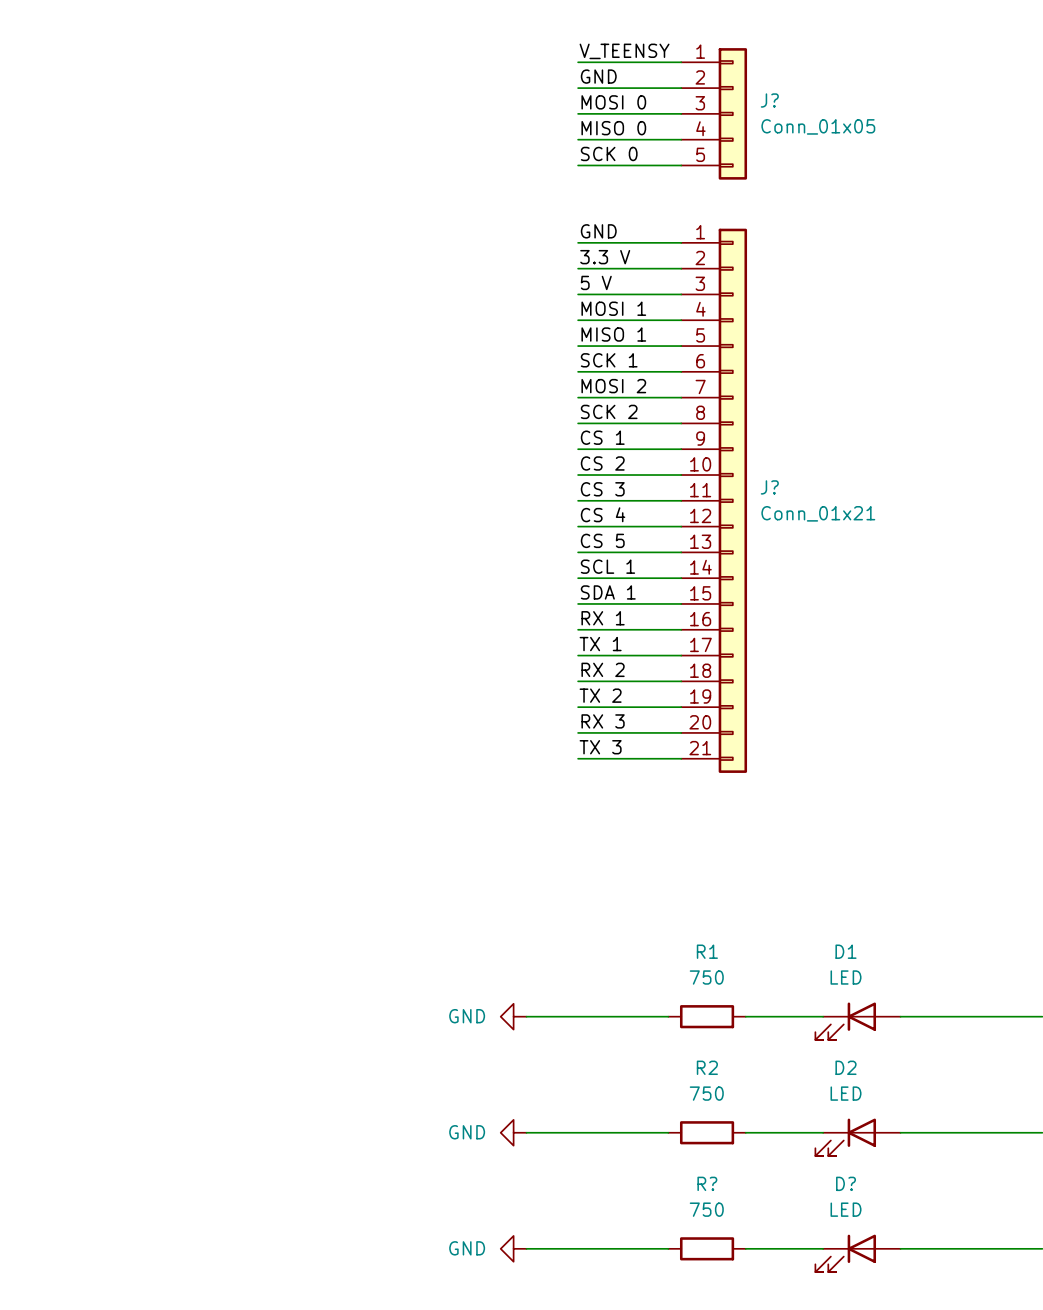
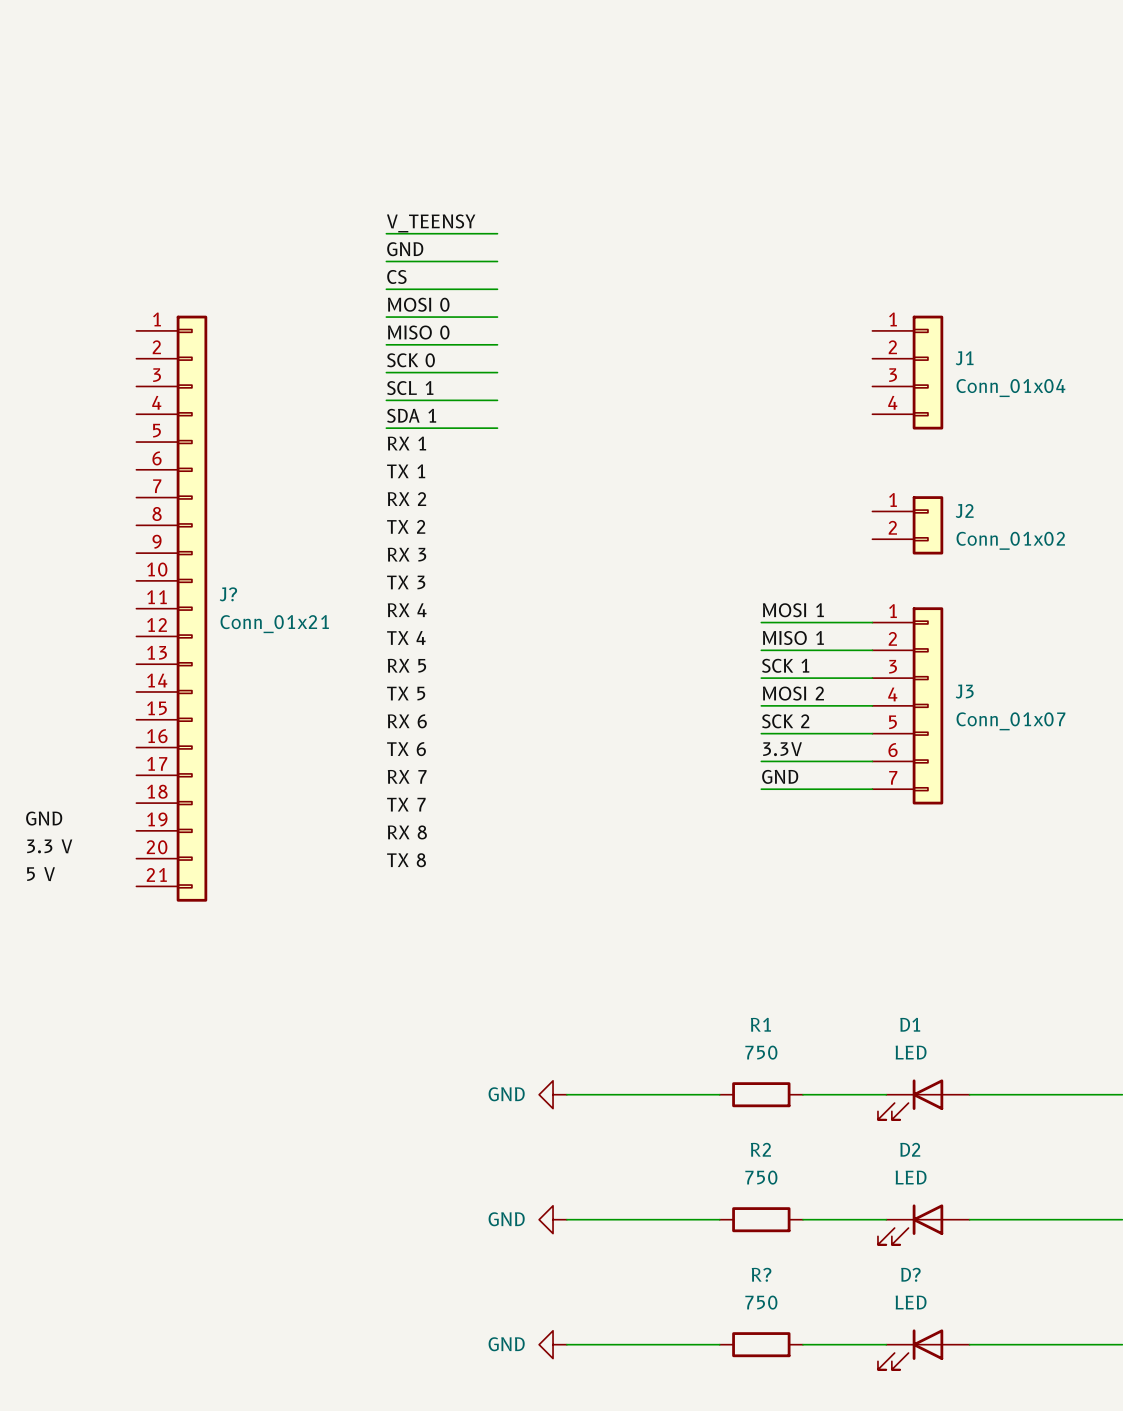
label: V_TEENSY (624, 51) -> none
wire: (578, 62) (681, 62) -> none
label: GND (598, 76) -> none
wire: (578, 88) (681, 88) -> none
label: MOSI 0 (613, 102) -> none
wire: (578, 113) (681, 113) -> none
J?: Conn_01x05 (714, 113) -> none
label: MISO 0 (613, 128) -> none
wire: (578, 139) (681, 139) -> none
label: SCK 0 (609, 153) -> none
wire: (578, 165) (681, 165) -> none
label: none -> V_TEENSY (431, 223)
label: none -> GND (405, 249)
label: GND (598, 231) -> none
wire: (578, 242) (681, 242) -> (386, 233) (497, 233)
label: none -> CS (396, 276)
label: 3.3 V (605, 257) -> none
wire: (578, 268) (681, 268) -> (386, 261) (497, 261)
label: none -> MOSI 0 (418, 304)
label: 5 V (596, 282) -> none
wire: (578, 294) (681, 294) -> (386, 289) (497, 289)
label: none -> MISO 0 (418, 332)
label: MOSI 1 (613, 308) -> none
wire: (578, 320) (681, 320) -> (386, 317) (497, 317)
label: none -> SCK 0 (411, 360)
label: MISO 1 (613, 334) -> none
wire: (578, 346) (681, 346) -> (386, 344) (497, 344)
J1: none -> Conn_01x04 (907, 372)
label: none -> SCL 1 (410, 388)
label: SCK 1 (609, 360) -> none
wire: (578, 371) (681, 371) -> (386, 372) (497, 372)
label: none -> SDA 1 (411, 415)
label: MOSI 2 (613, 386) -> none
wire: (578, 397) (681, 397) -> (386, 400) (497, 400)
label: none -> RX 1 (406, 443)
label: SCK 2 (609, 411) -> none
wire: (578, 423) (681, 423) -> (386, 428) (497, 428)
label: none -> TX 1 (406, 471)
label: CS 1 (602, 437) -> none
wire: (578, 449) (681, 449) -> none
label: none -> RX 2 (406, 499)
label: CS 2 (602, 463) -> none
wire: (578, 475) (681, 475) -> none
J2: none -> Conn_01x02 (907, 525)
label: none -> TX 2 (406, 526)
label: CS 3 (602, 489) -> none
wire: (578, 500) (681, 500) -> none
J?: Conn_01x21 (714, 500) -> none
label: CS 4 (603, 514) -> none
label: none -> RX 3 (406, 554)
wire: (578, 526) (681, 526) -> none
label: none -> TX 3 (406, 582)
label: CS 5 (602, 540) -> none
wire: (578, 552) (681, 552) -> none
J?: none -> Conn_01x21 (171, 608)
label: none -> RX 4 (407, 610)
label: SCL 1 (607, 566) -> none
label: none -> MOSI 1 (793, 610)
wire: (578, 578) (681, 578) -> (761, 622) (872, 622)
label: none -> TX 4 (406, 637)
label: SDA 1 (608, 592) -> none
label: none -> MISO 1 (793, 638)
wire: (578, 603) (681, 603) -> (761, 650) (872, 650)
label: none -> RX 5 (406, 665)
label: RX 1 (603, 618) -> none
label: none -> SCK 1 (785, 665)
wire: (578, 629) (681, 629) -> (761, 678) (872, 678)
label: none -> TX 5 (406, 693)
label: TX 1 (600, 644) -> none
label: none -> MOSI 2 (793, 693)
wire: (578, 655) (681, 655) -> (761, 705) (872, 705)
J3: none -> Conn_01x07 (907, 705)
label: none -> RX 6 (407, 721)
label: RX 2 (603, 669) -> none
label: none -> SCK 2 (785, 721)
wire: (578, 681) (681, 681) -> (761, 733) (872, 733)
label: none -> TX 6 (406, 749)
label: TX 2 (600, 695) -> none
label: none -> 3.3V (782, 749)
wire: (578, 707) (681, 707) -> (761, 761) (872, 761)
label: none -> RX 7 (407, 776)
label: RX 3 (603, 721) -> none
label: none -> GND (780, 776)
wire: (578, 732) (681, 732) -> (761, 789) (872, 789)
label: none -> TX 7 (406, 804)
label: TX 3 (600, 747) -> none
wire: (578, 758) (681, 758) -> none
label: none -> GND (44, 818)
label: none -> RX 8 (407, 832)
label: none -> 3.3 V (49, 846)
label: none -> TX 8 (406, 860)
label: none -> 5 V (41, 874)

